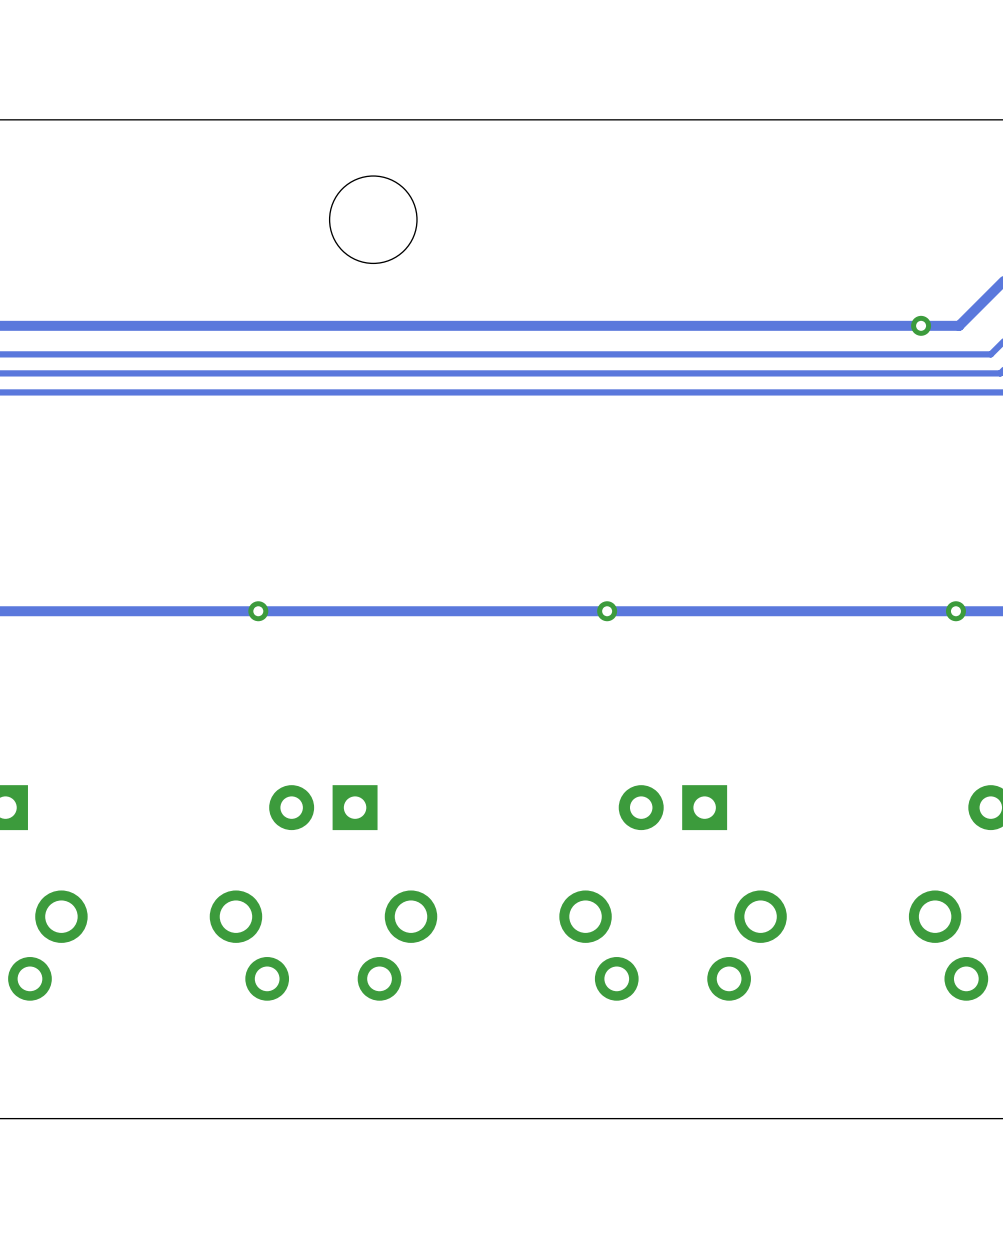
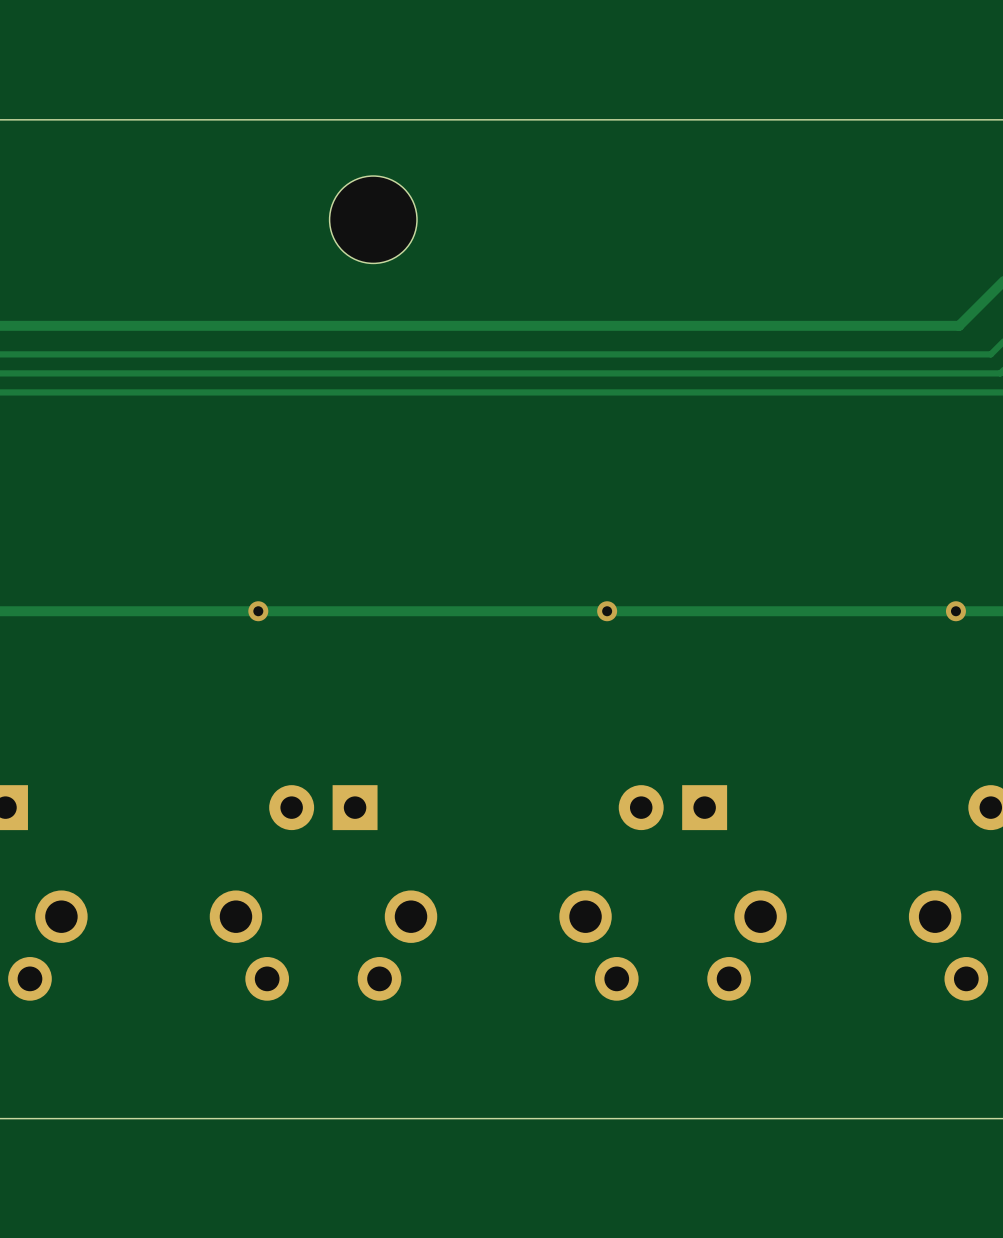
via: (921, 325) -> none

